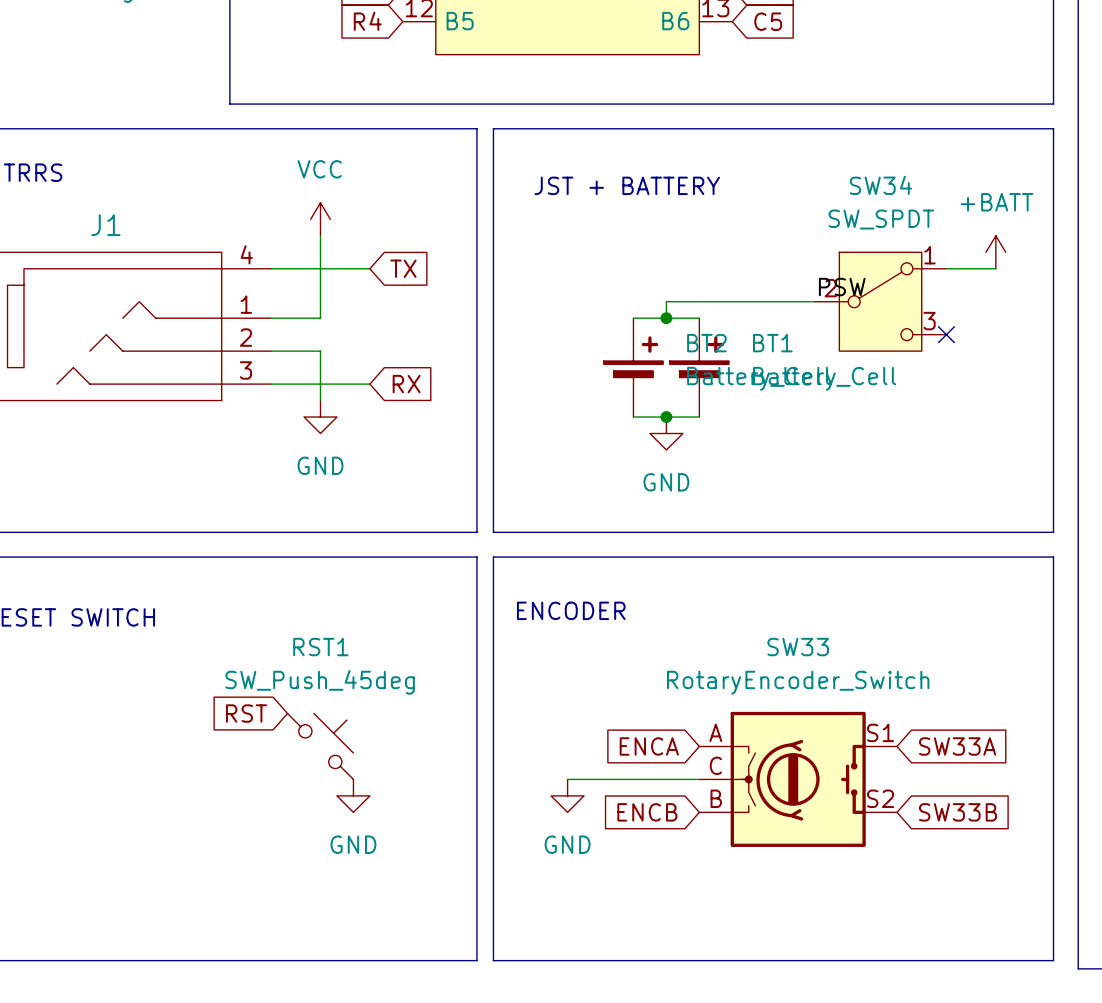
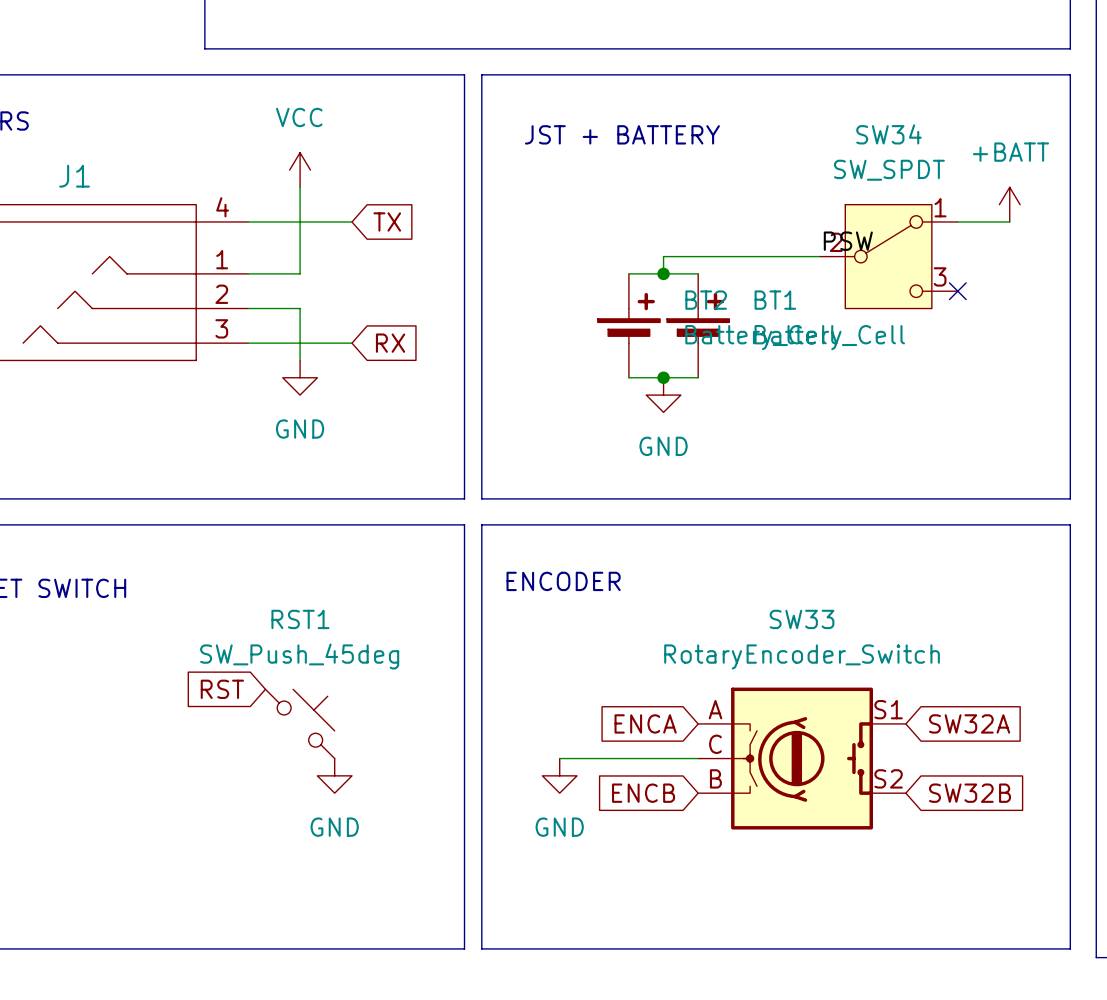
global label: SW33A (957, 746) -> SW32A (969, 723)
global label: SW33B (958, 812) -> SW32B (969, 793)

